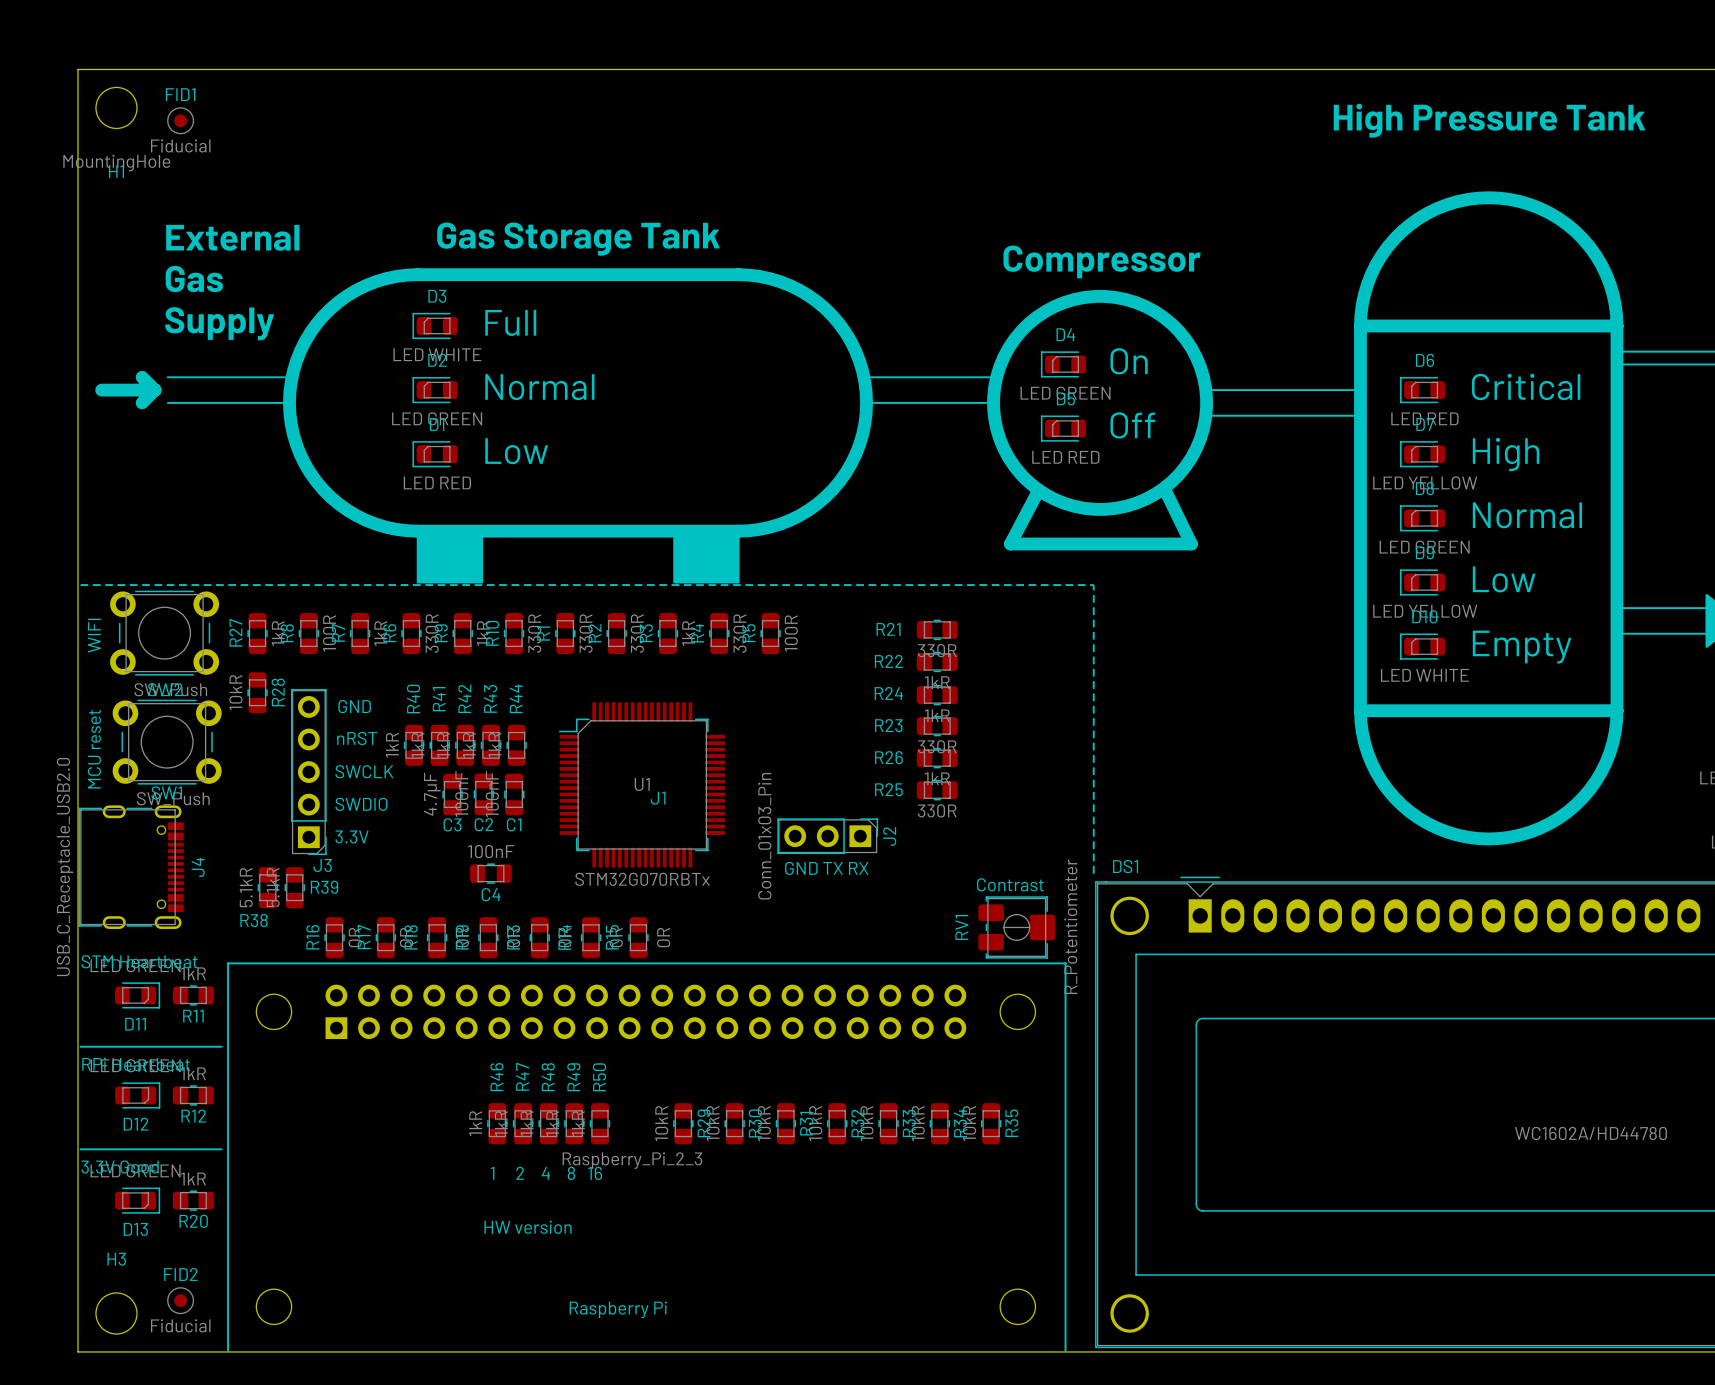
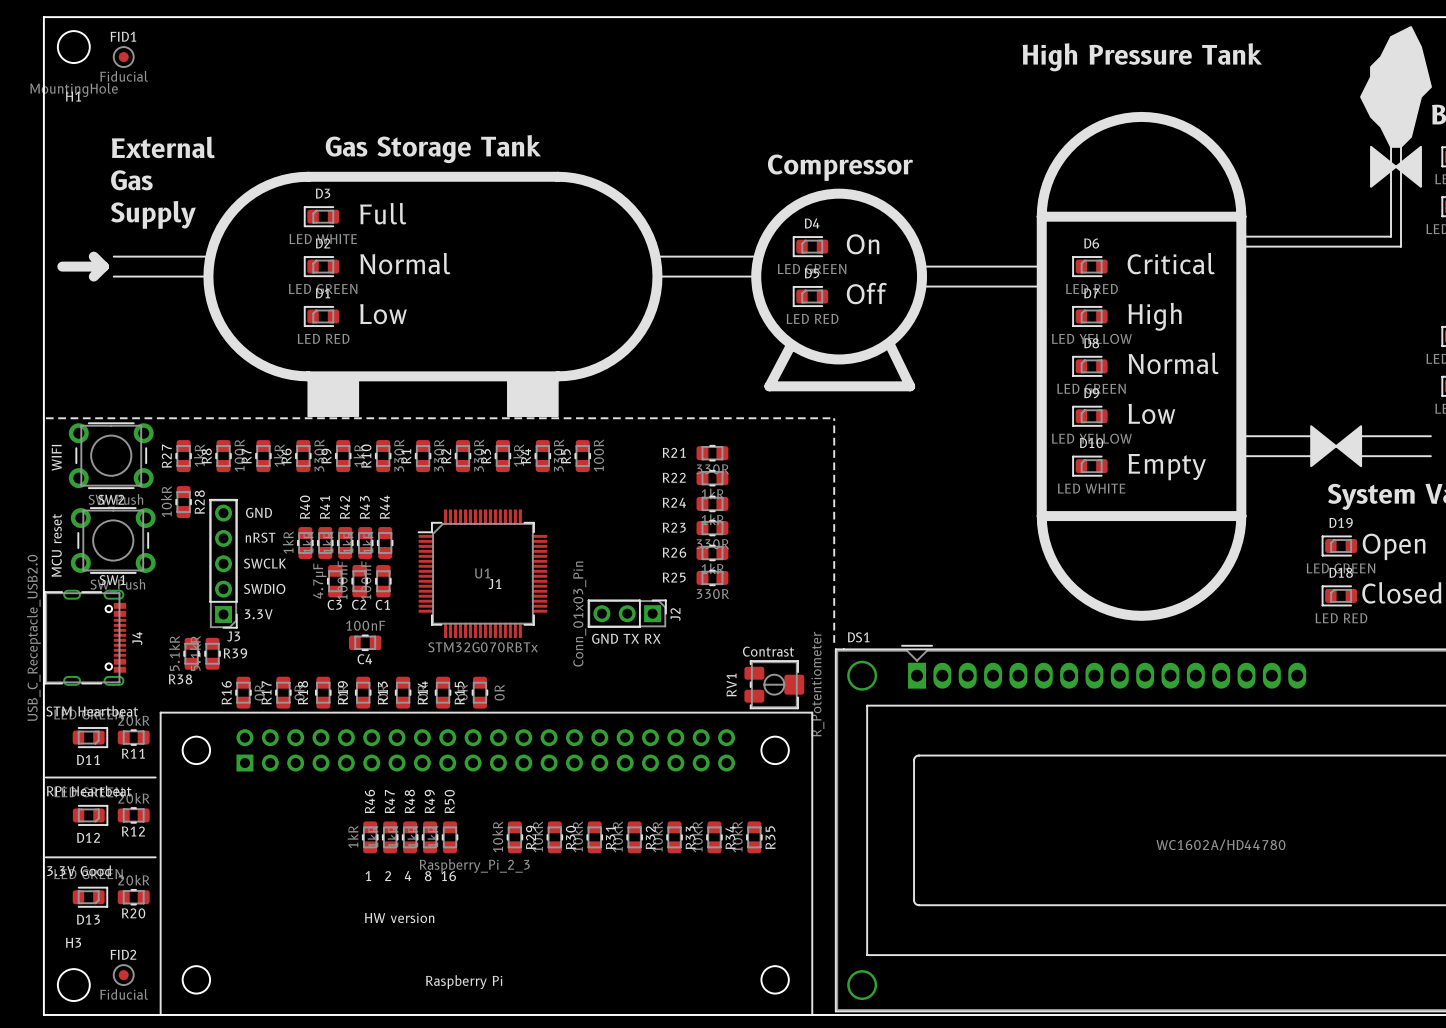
R11 value: 1kR (193, 973) -> 20kR (133, 720)
R12 value: 1kR (193, 1073) -> 20kR (133, 798)
R20 value: 1kR (193, 1178) -> 20kR (133, 880)

